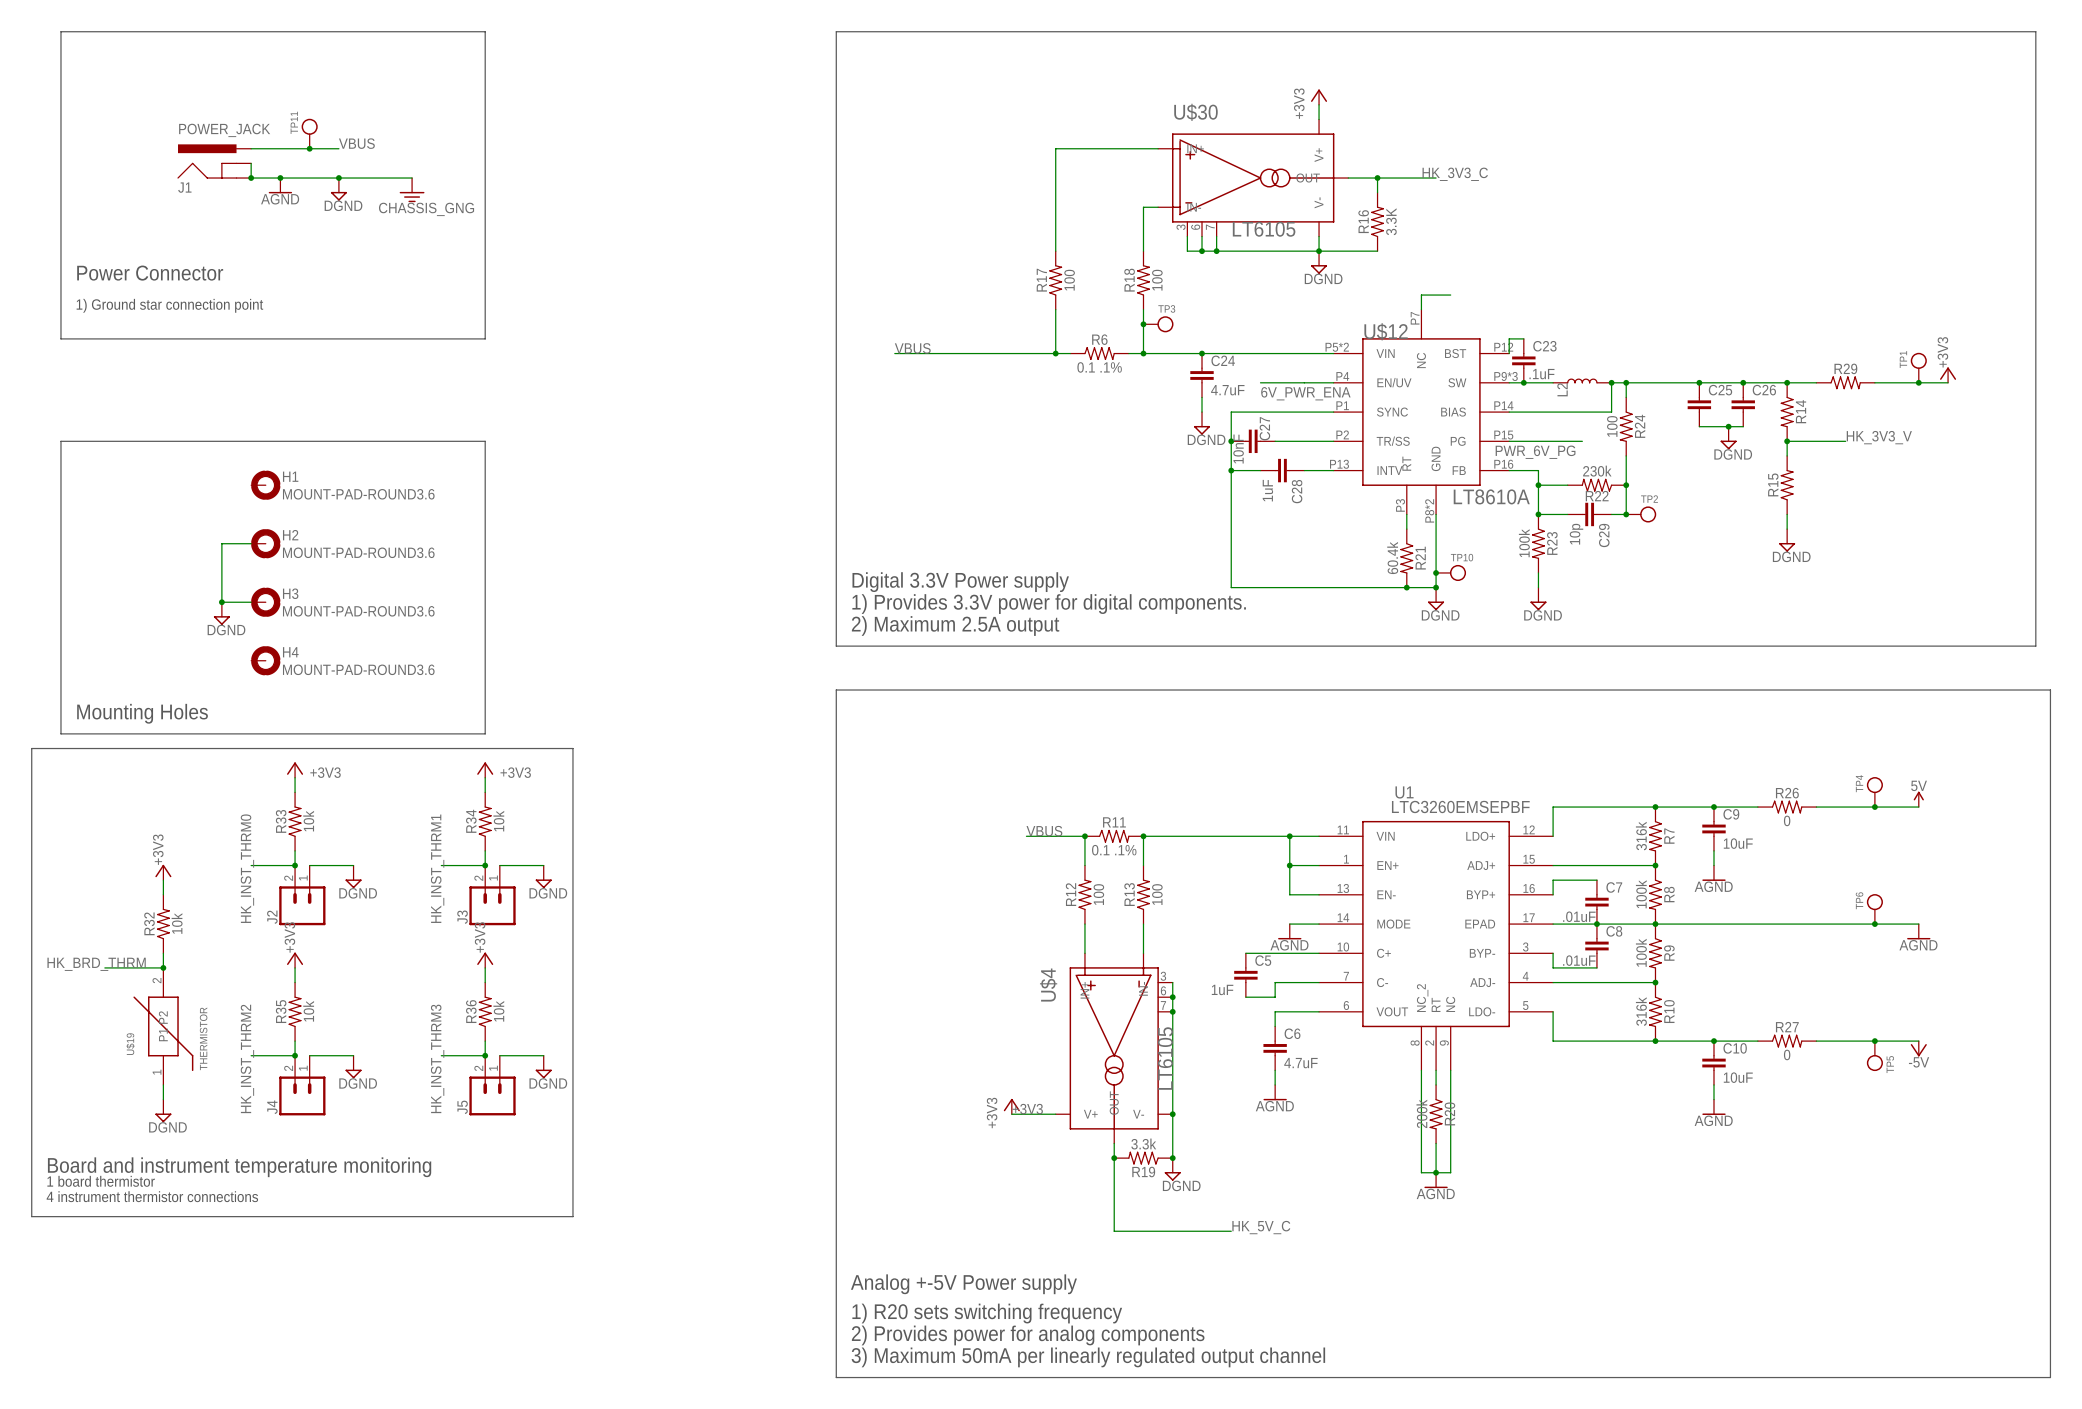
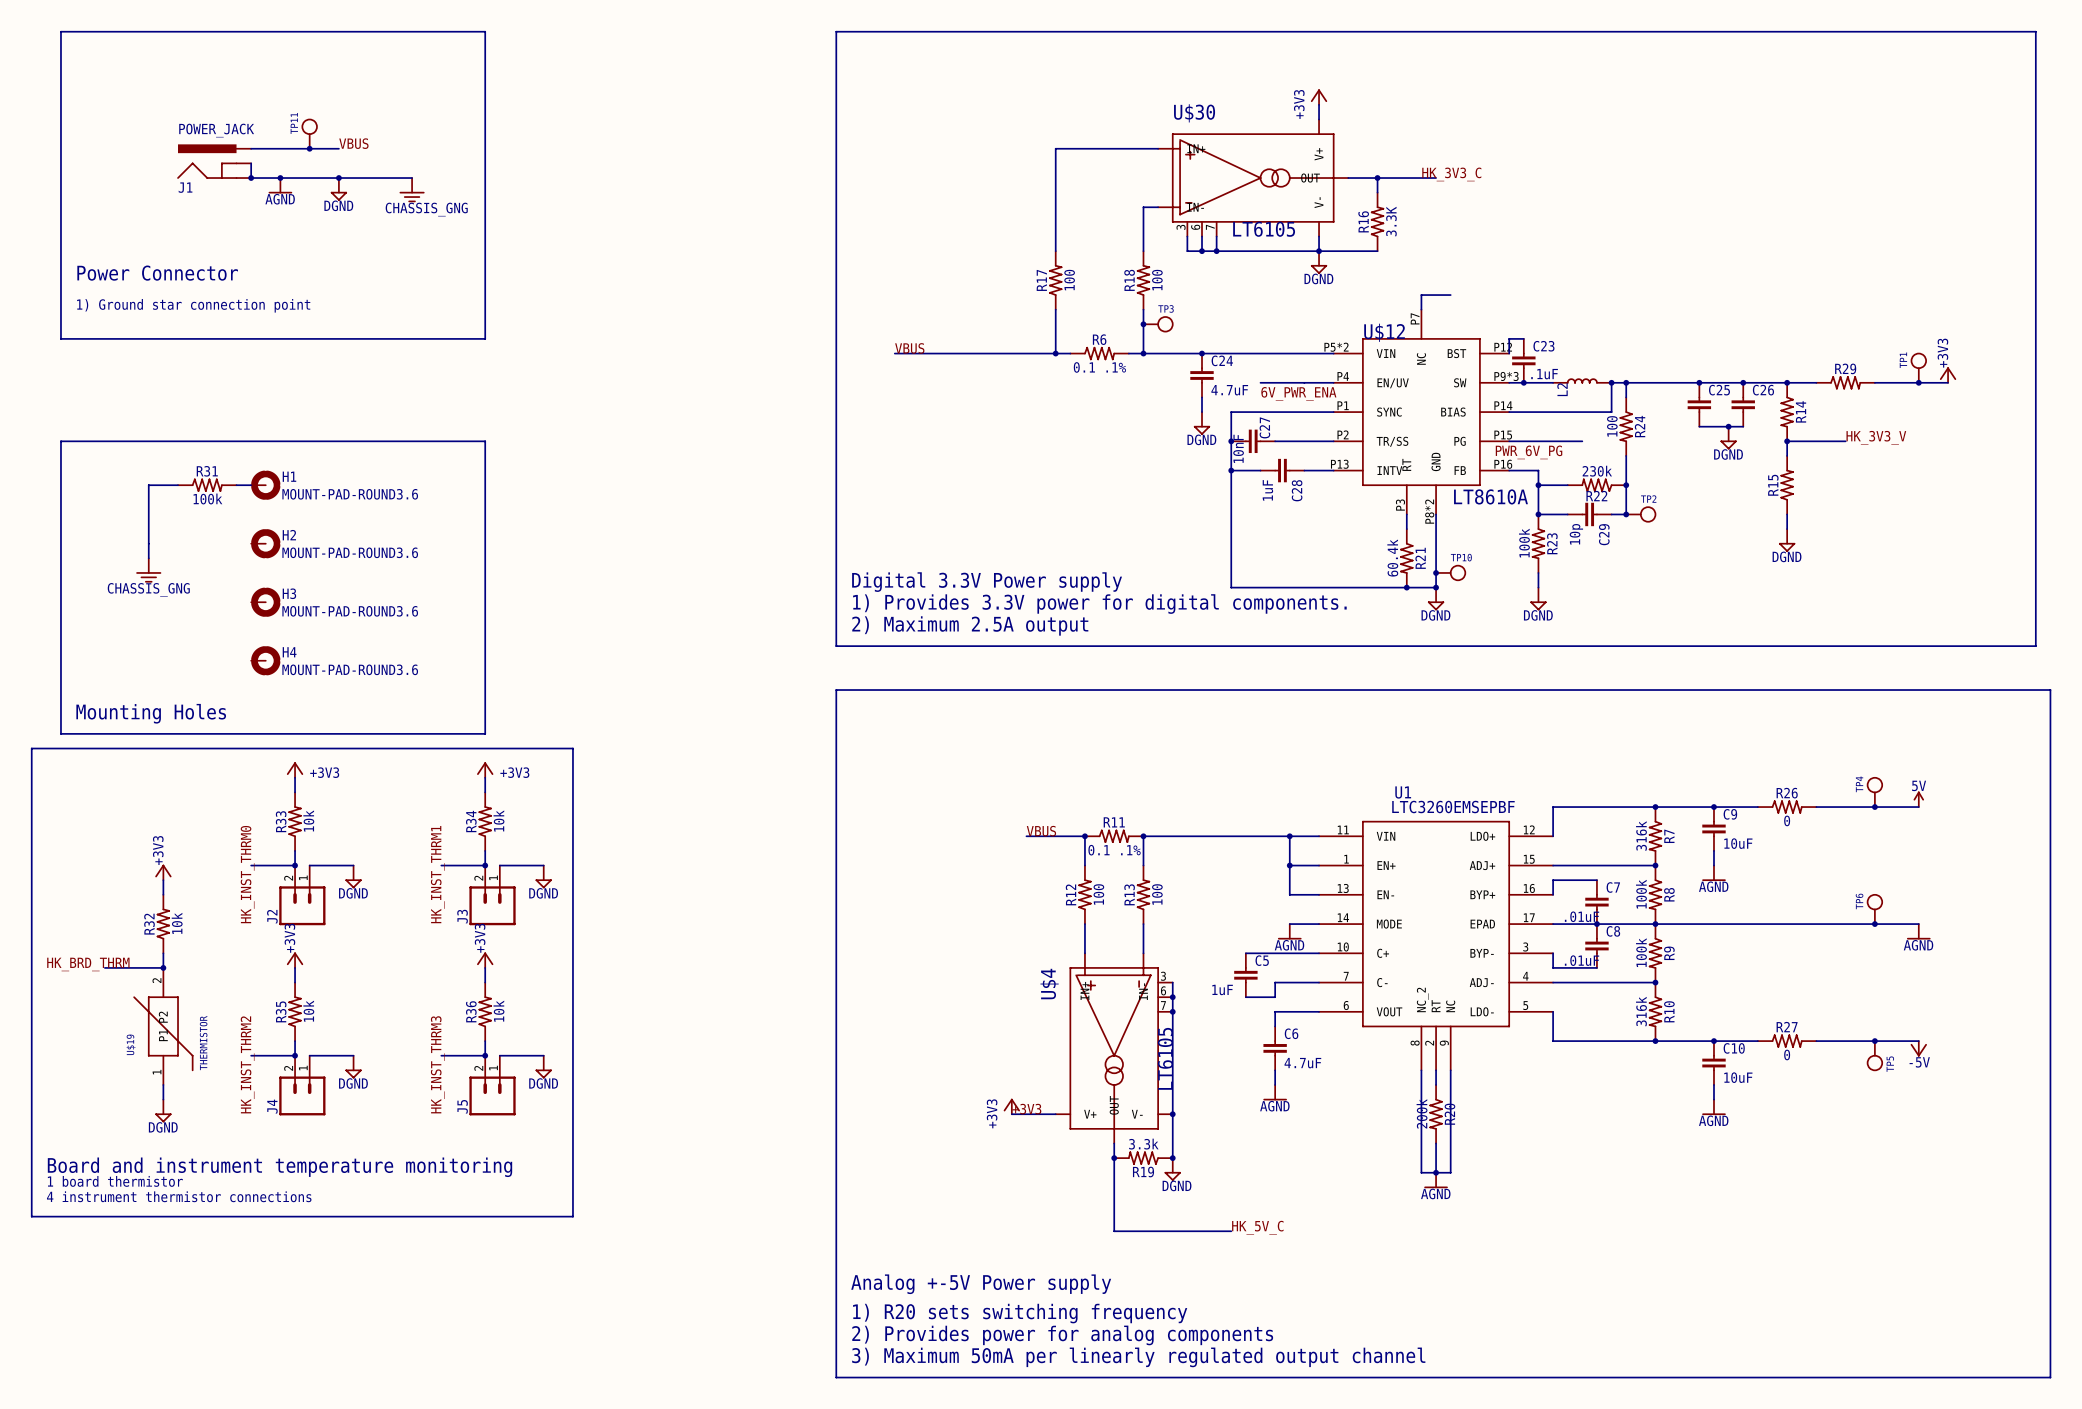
wire: none -> (178, 485) (148, 485) (148, 558)
R31: none -> 100k (207, 485)
wire: none -> (236, 485) (251, 485)
wire: (251, 543) (221, 543) (221, 602) (251, 602) -> none
power symbol: none -> CHASSIS_GNG (148, 570)
junction: (221, 602) -> none
power symbol: DGND (221, 613) -> none

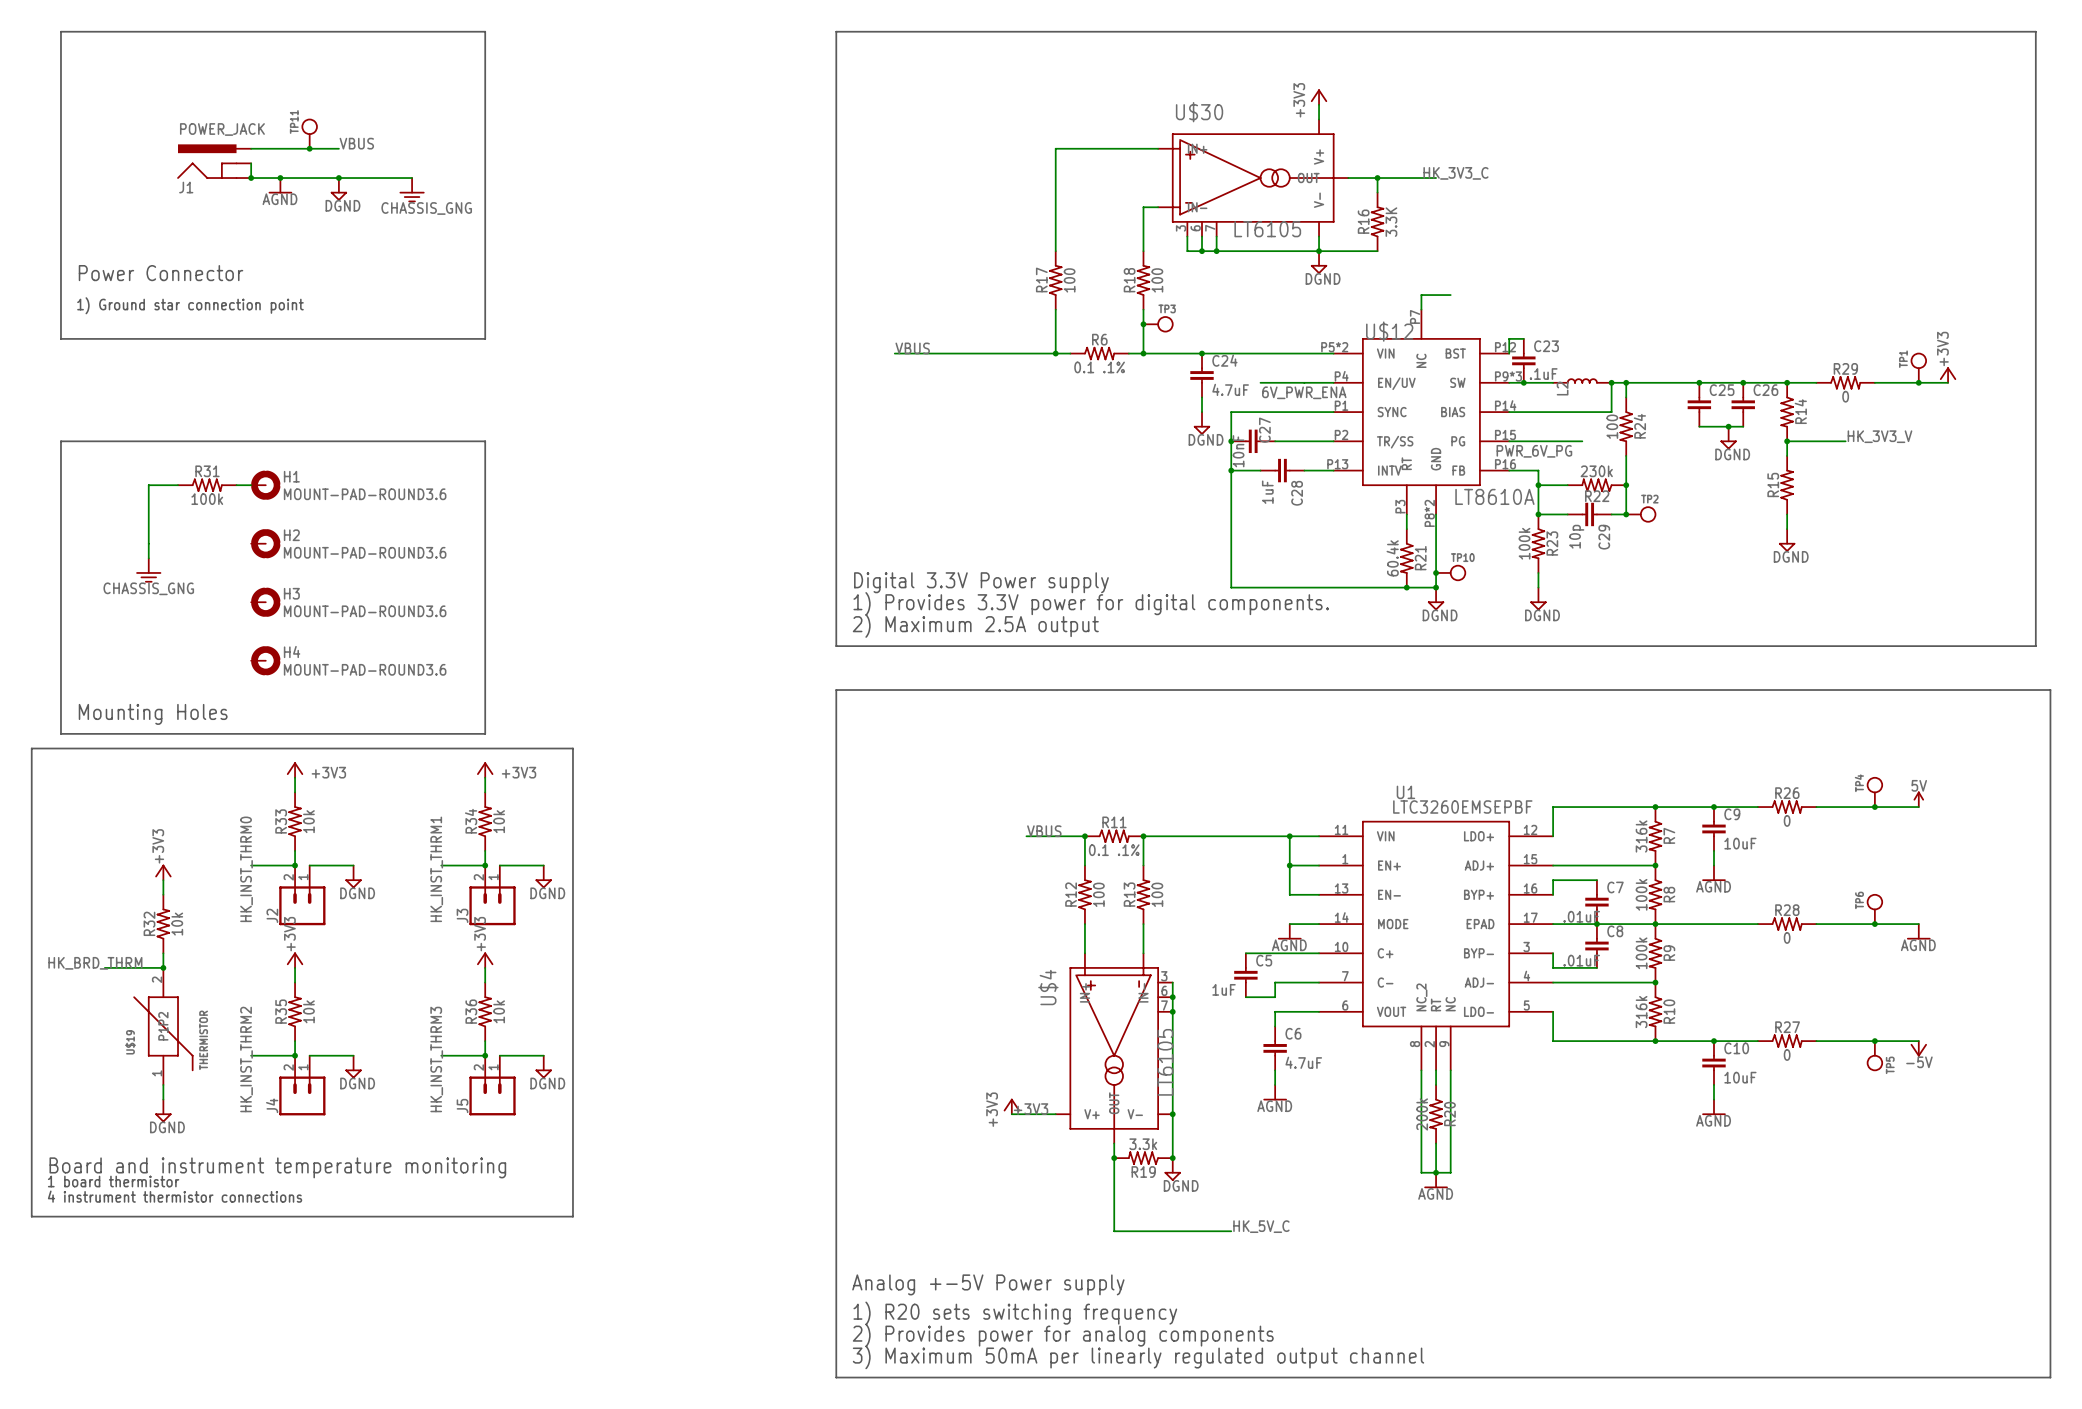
R29 value: none -> 0 (1845, 396)
R28: none -> 0 (1787, 924)

